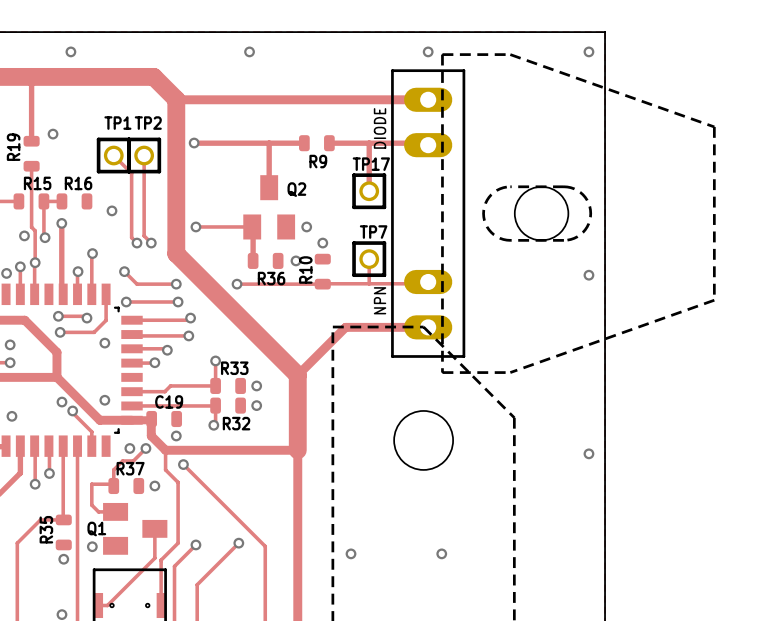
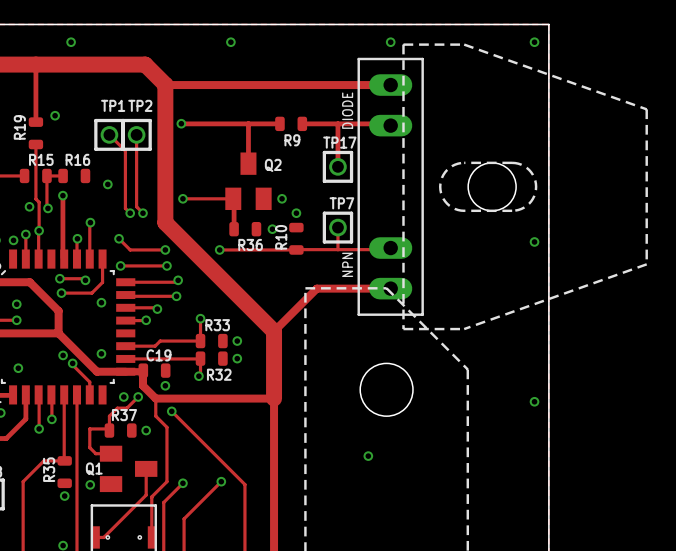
via: none -> (368, 456)
via: (351, 553) -> none
via: (441, 553) -> none

